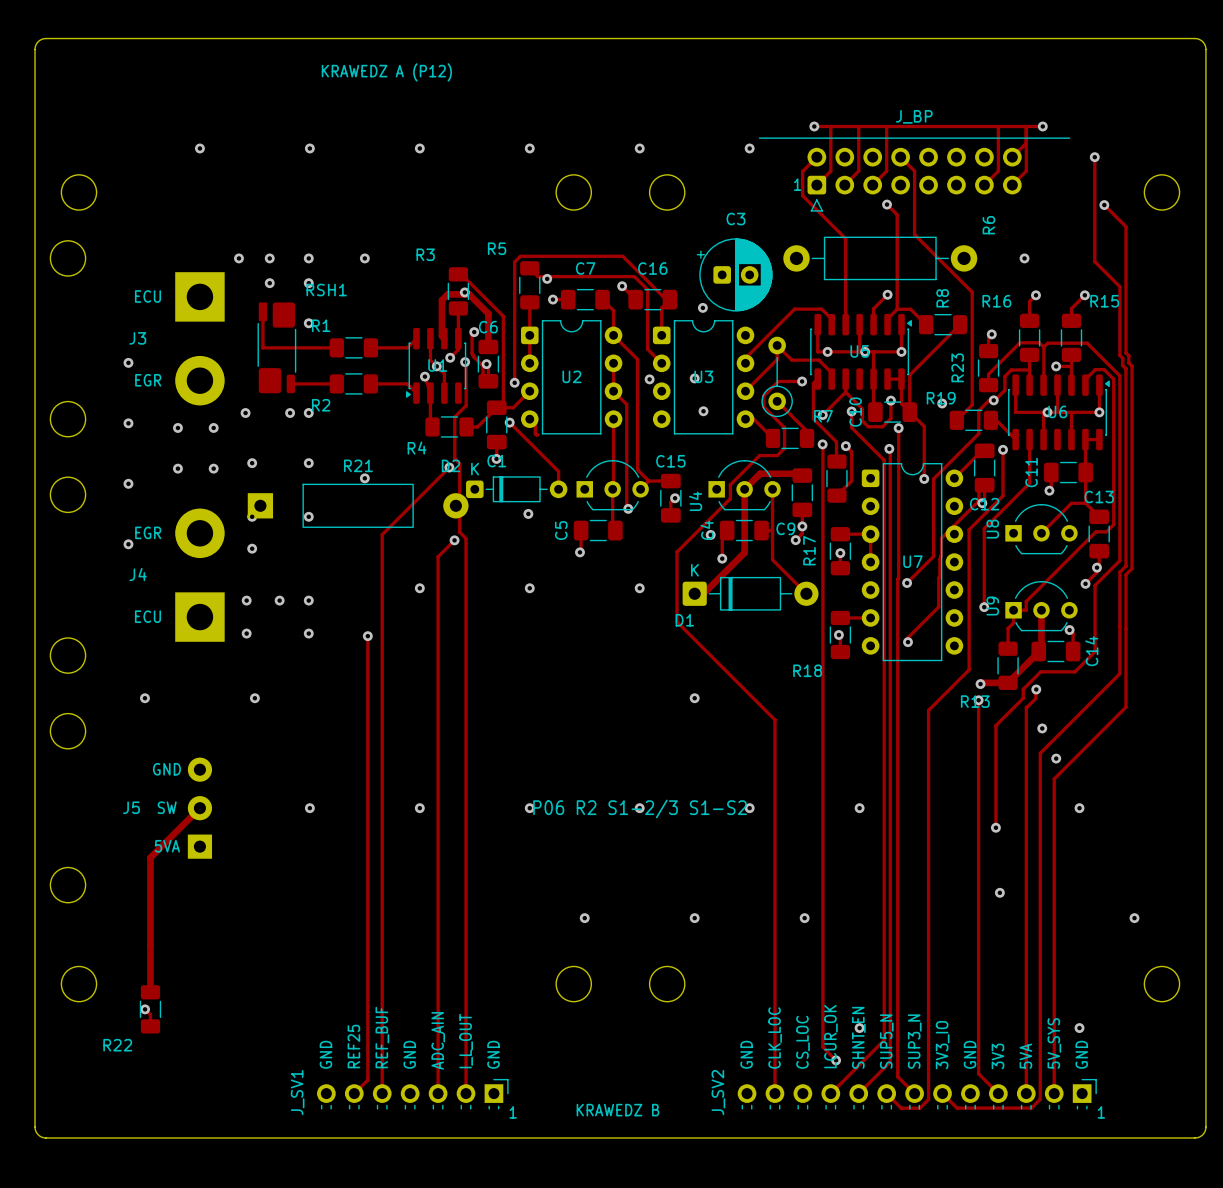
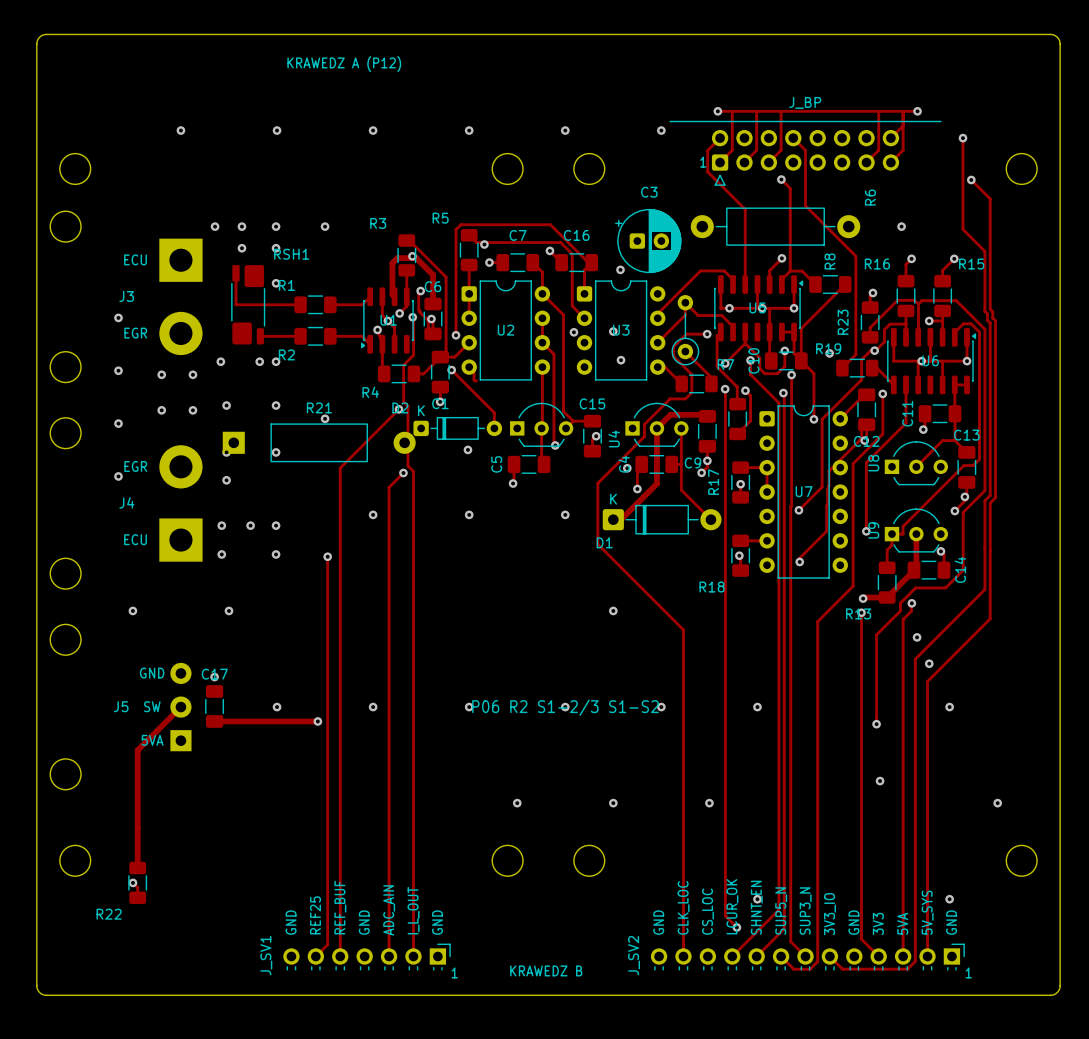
via: none -> (214, 677)
C17: none -> (214, 706)
track: none -> (214, 721) (317, 721)
via: none -> (317, 721)

